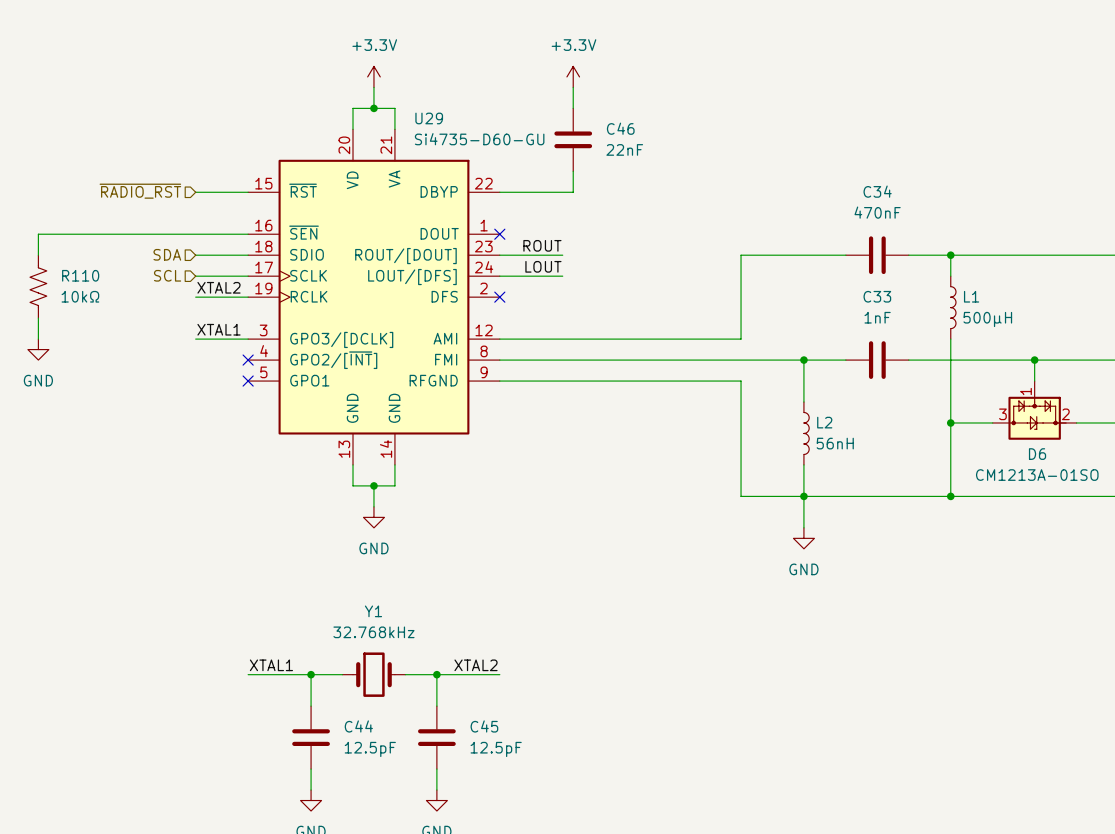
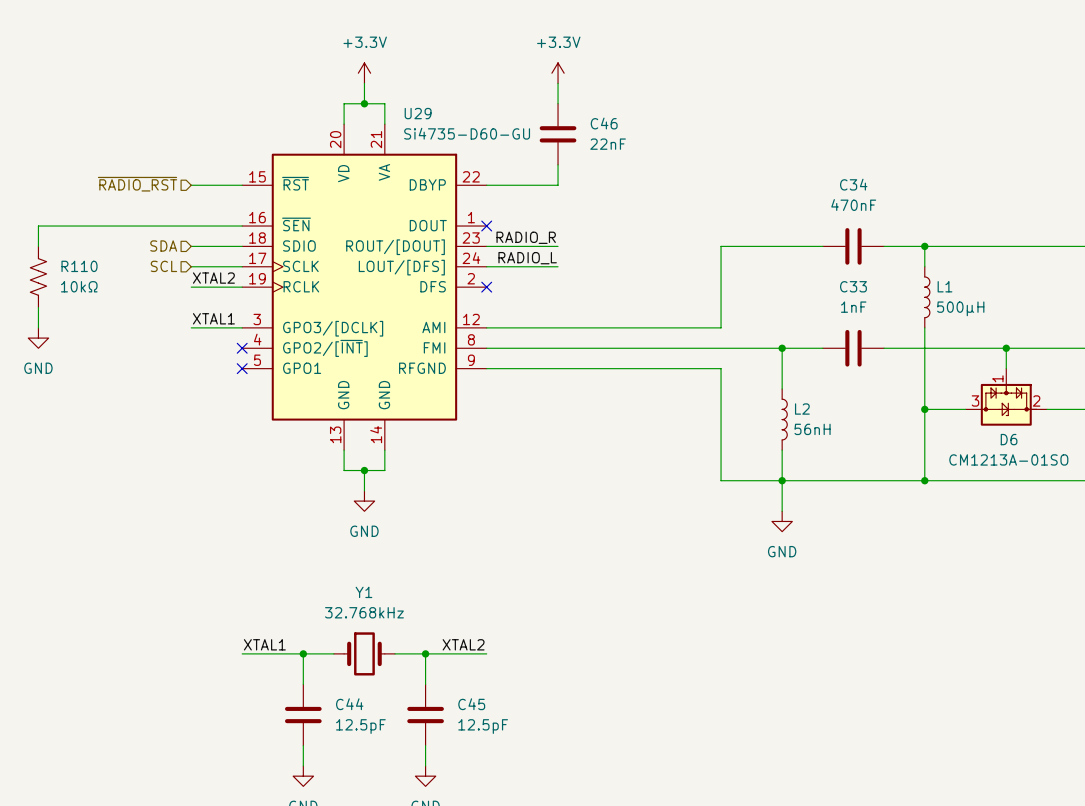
label: ROUT (542, 245) -> none
label: none -> RADIO_R (526, 237)
wire: none -> (547, 246) (558, 246)
label: LOUT (543, 266) -> none
label: none -> RADIO_L (527, 258)
wire: none -> (547, 266) (558, 266)

